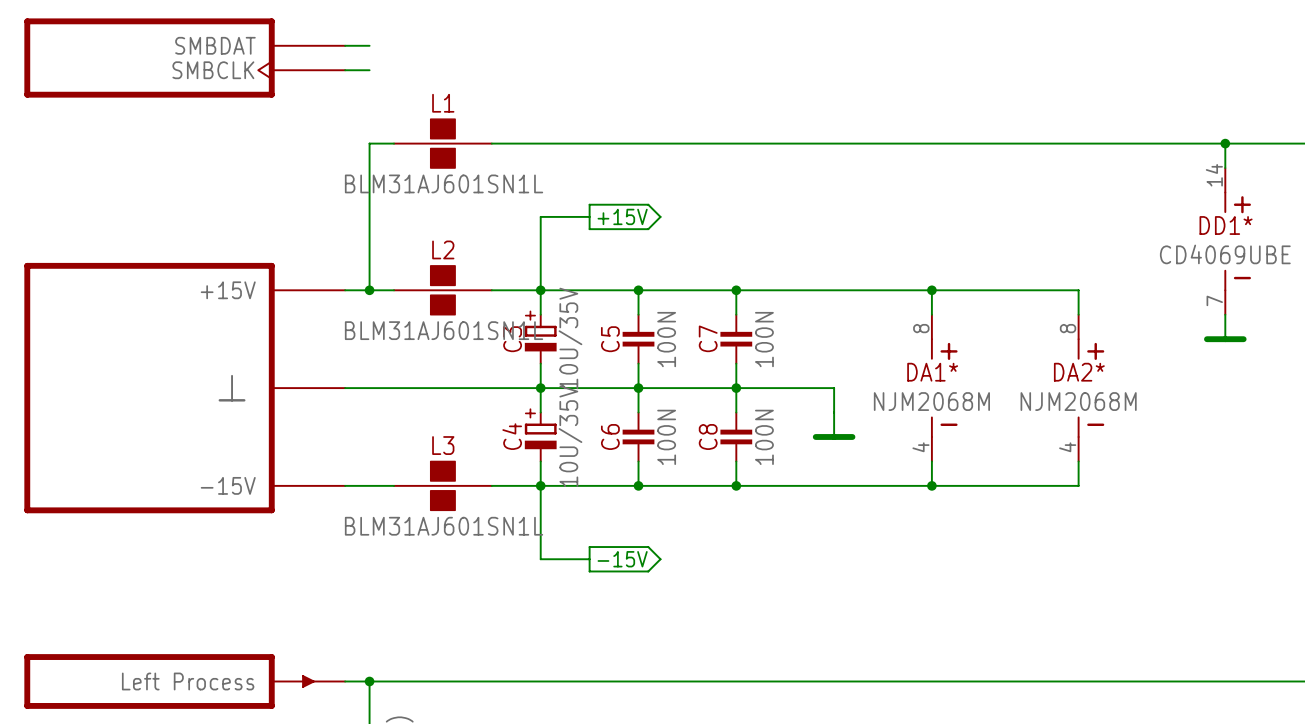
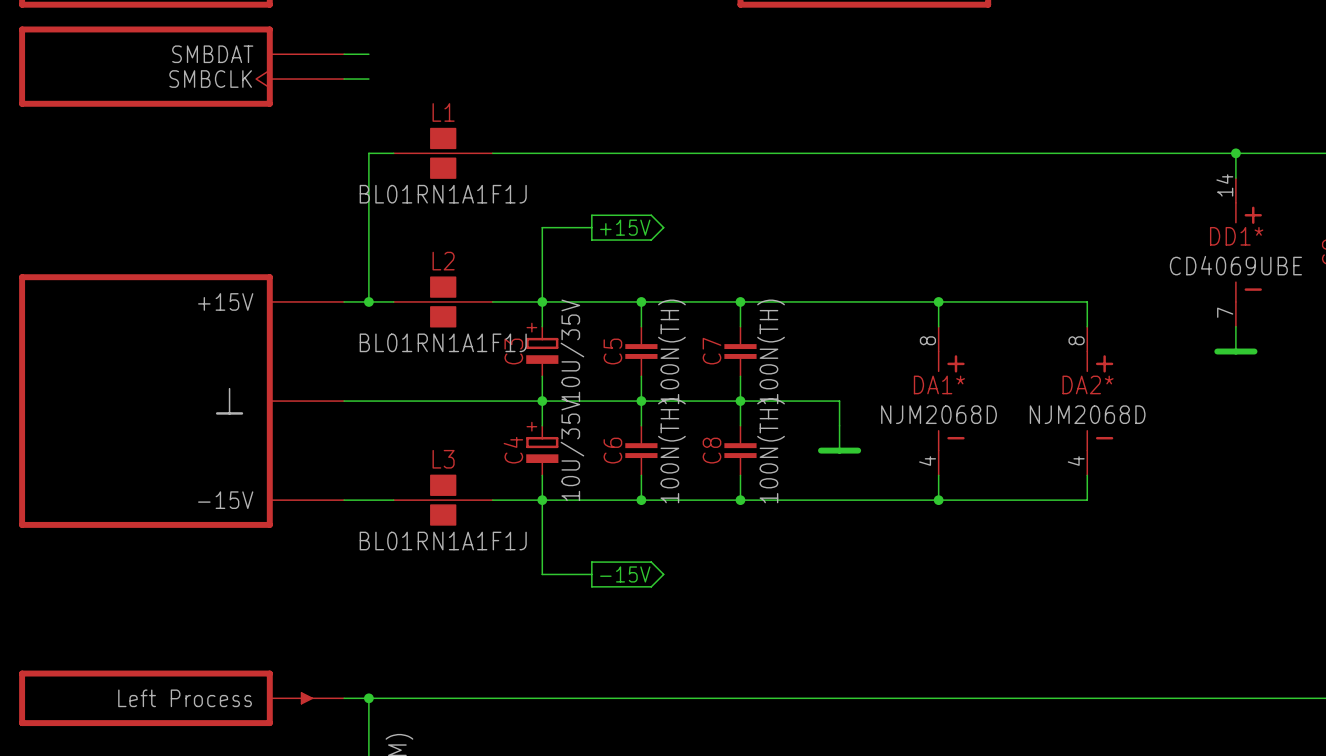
L1 value: BLM31AJ601SN1L (444, 183) -> BL01RN1A1F1J (443, 194)
L2 value: BLM31AJ601SN1L (444, 330) -> BL01RN1A1F1J (443, 342)
C5 value: 100N (666, 339) -> 100N(TH) (671, 351)
C7 value: 100N (764, 339) -> 100N(TH) (771, 351)
DA1* value: NJM2068M (931, 401) -> NJM2068D (939, 414)
DA2* value: NJM2068M (1078, 401) -> NJM2068D (1087, 414)
C6 value: 100N (666, 437) -> 100N(TH) (671, 450)
C8 value: 100N (764, 437) -> 100N(TH) (771, 450)
L3 value: BLM31AJ601SN1L (444, 526) -> BL01RN1A1F1J (443, 541)

